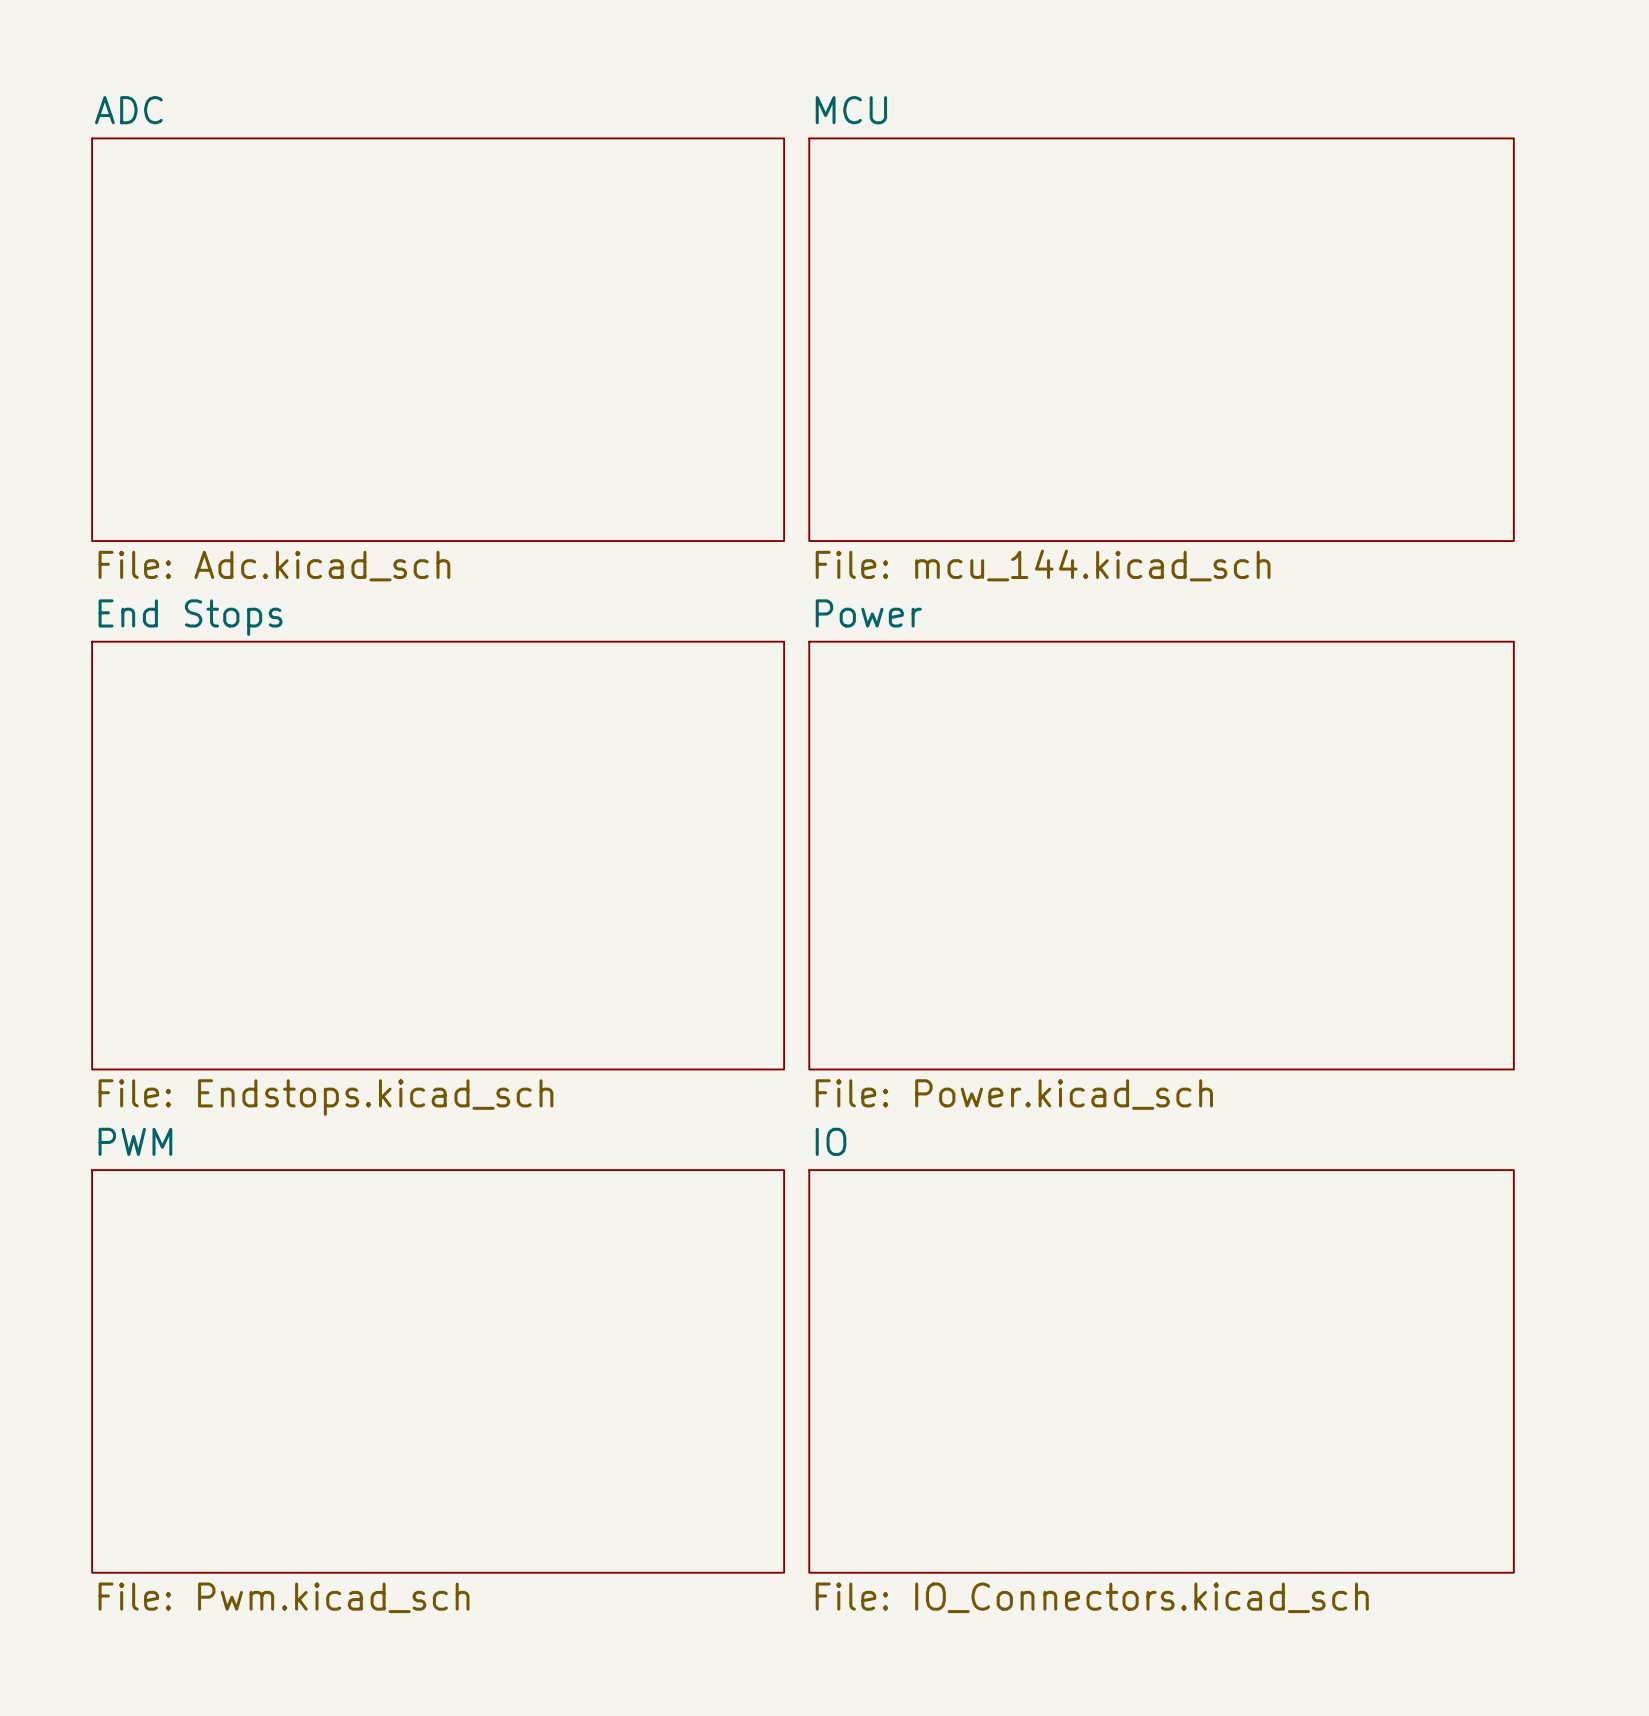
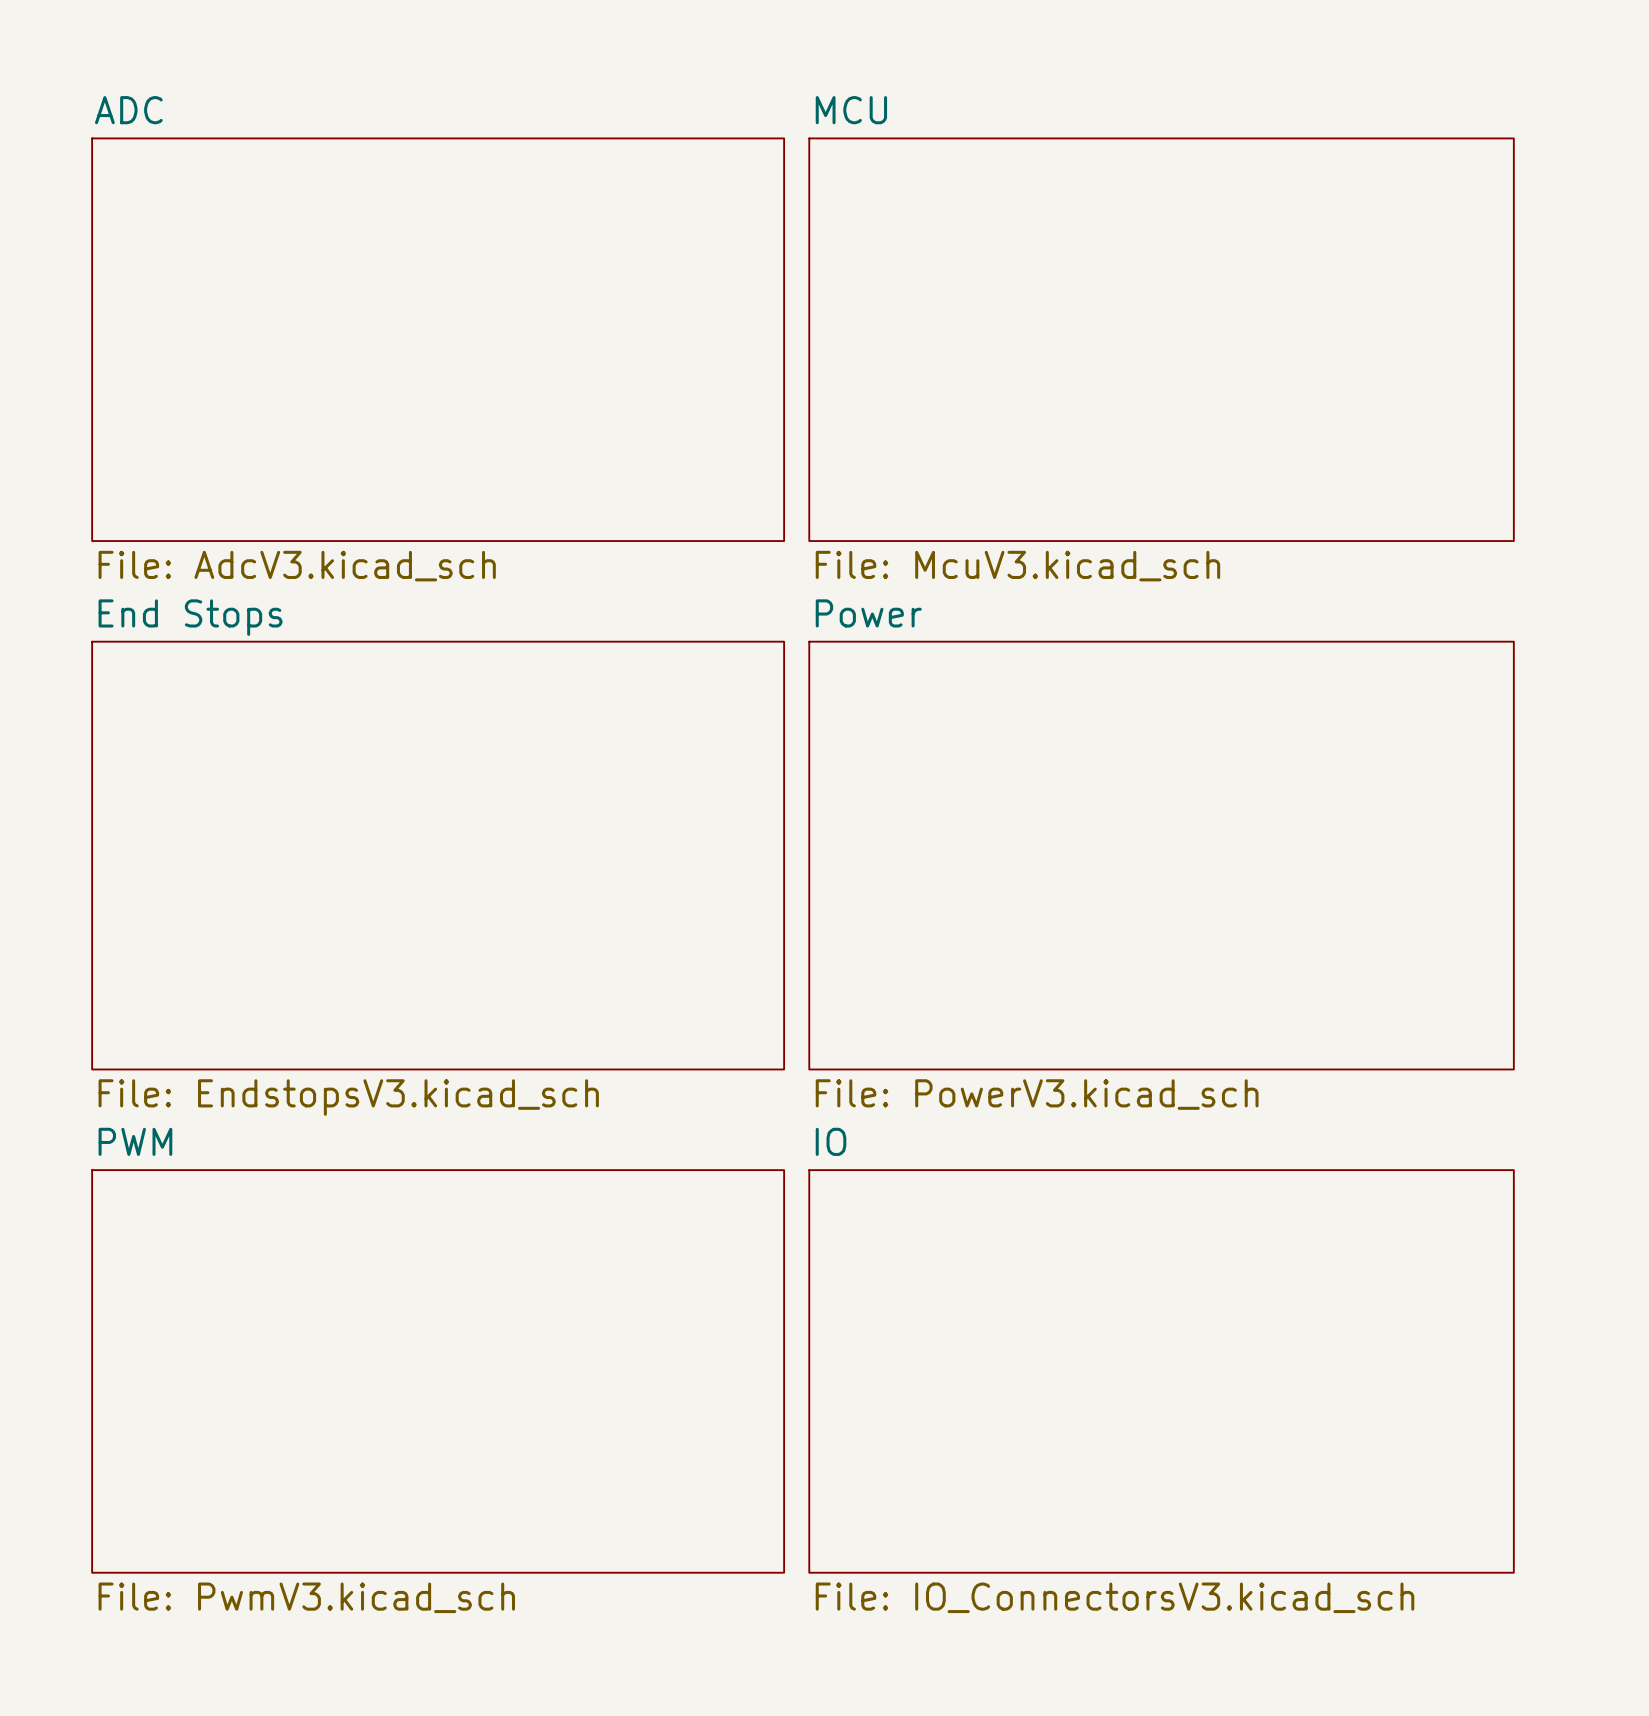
sheet MCU value: File: mcu_144.kicad_sch (1043, 565) -> File: McuV3.kicad_sch (1017, 566)
sheet ADC value: File: Adc.kicad_sch (274, 566) -> File: AdcV3.kicad_sch (297, 566)
sheet Power value: File: Power.kicad_sch (1014, 1094) -> File: PowerV3.kicad_sch (1037, 1094)
sheet End Stops value: File: Endstops.kicad_sch (325, 1097) -> File: EndstopsV3.kicad_sch (348, 1097)
sheet PWM value: File: Pwm.kicad_sch (284, 1597) -> File: PwmV3.kicad_sch (306, 1597)
sheet IO value: File: IO_Connectors.kicad_sch (1092, 1597) -> File: IO_ConnectorsV3.kicad_sch (1115, 1597)

